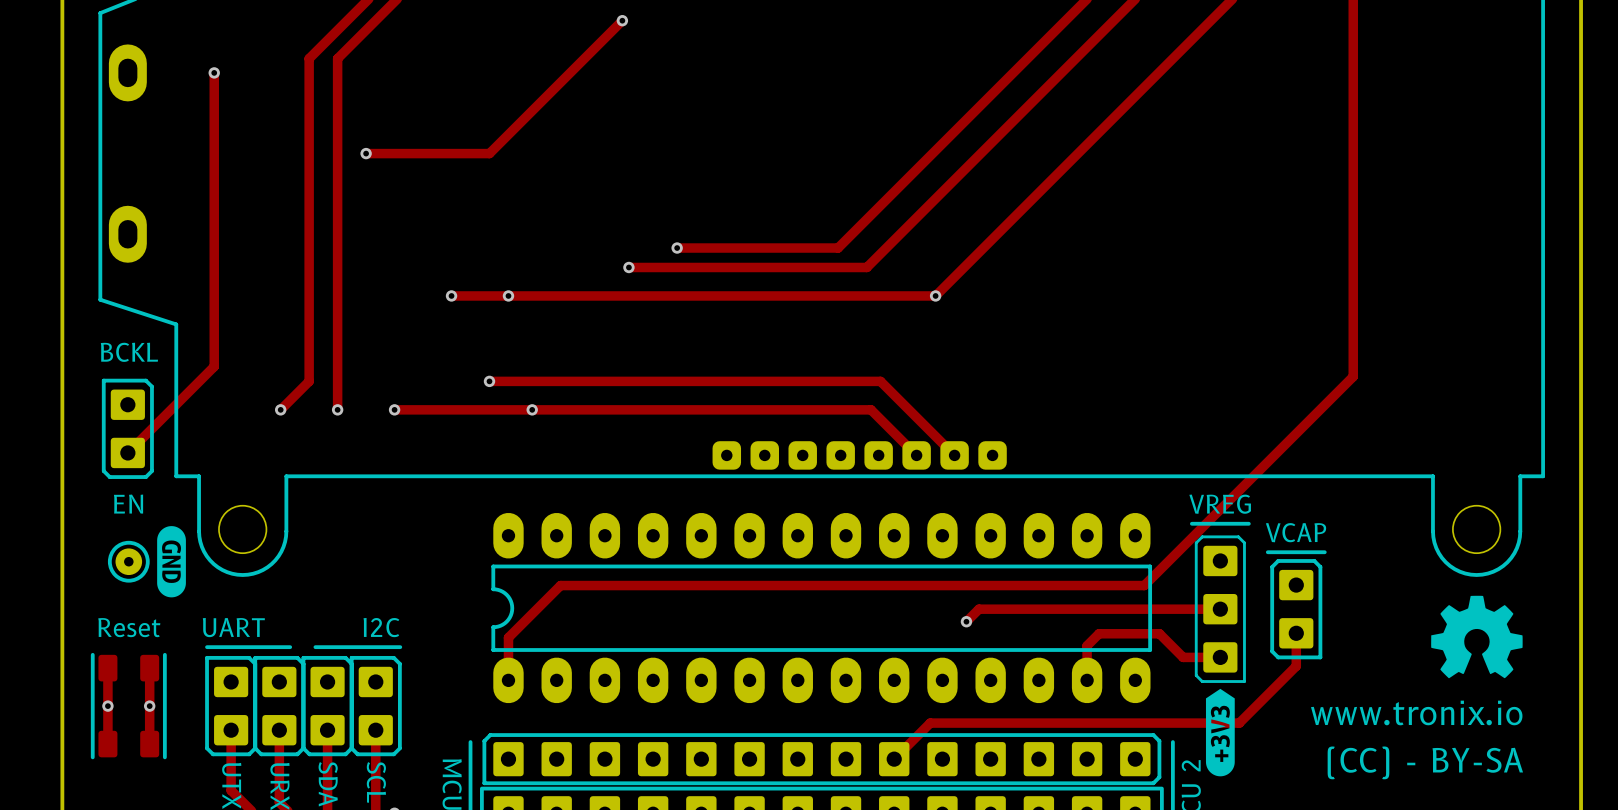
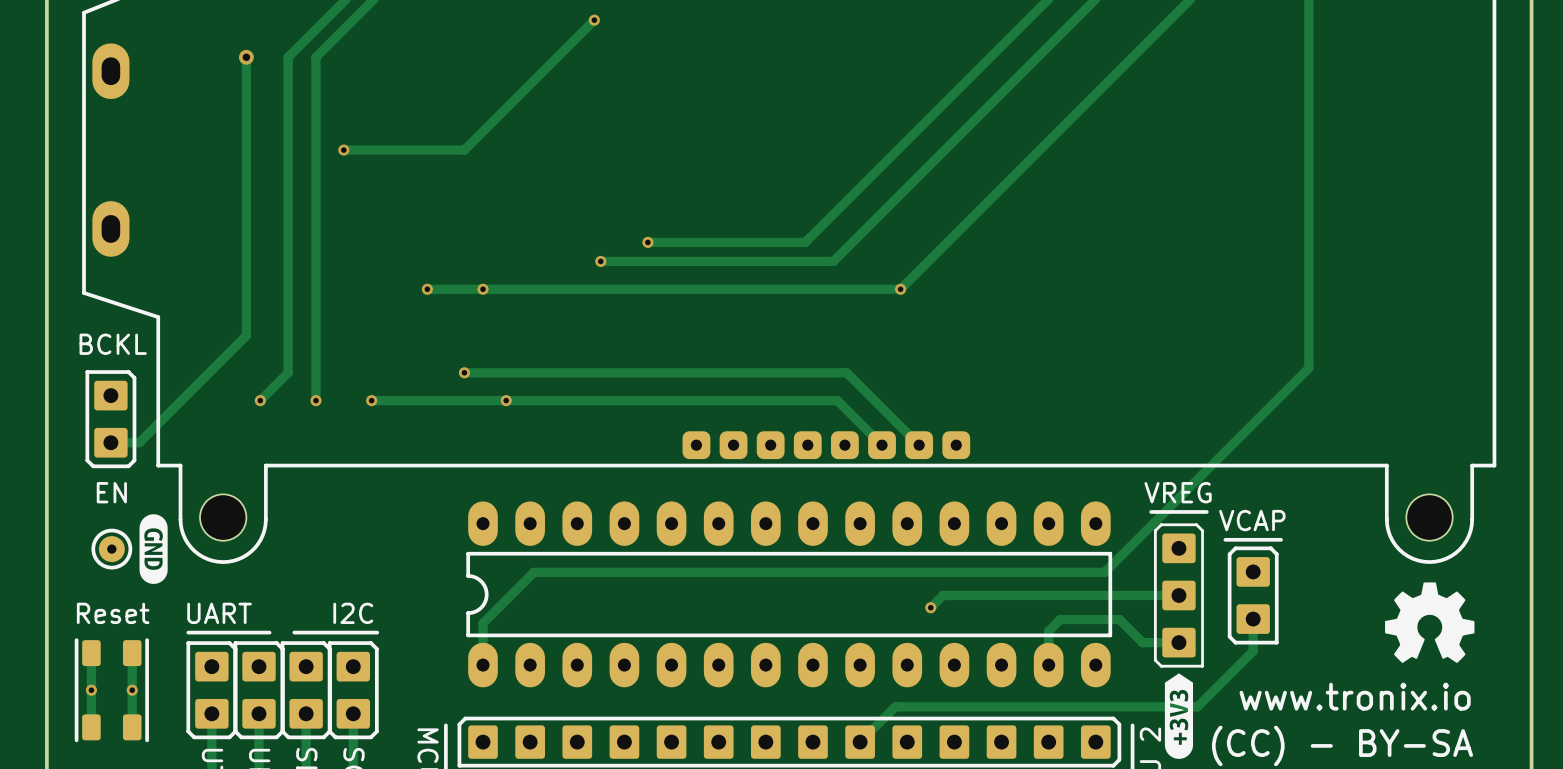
via: none -> (246, 57)
track: (214, 72) (214, 366) (127, 452) -> (246, 57) (246, 335) (139, 442) (110, 442)
via: (214, 72) -> none

